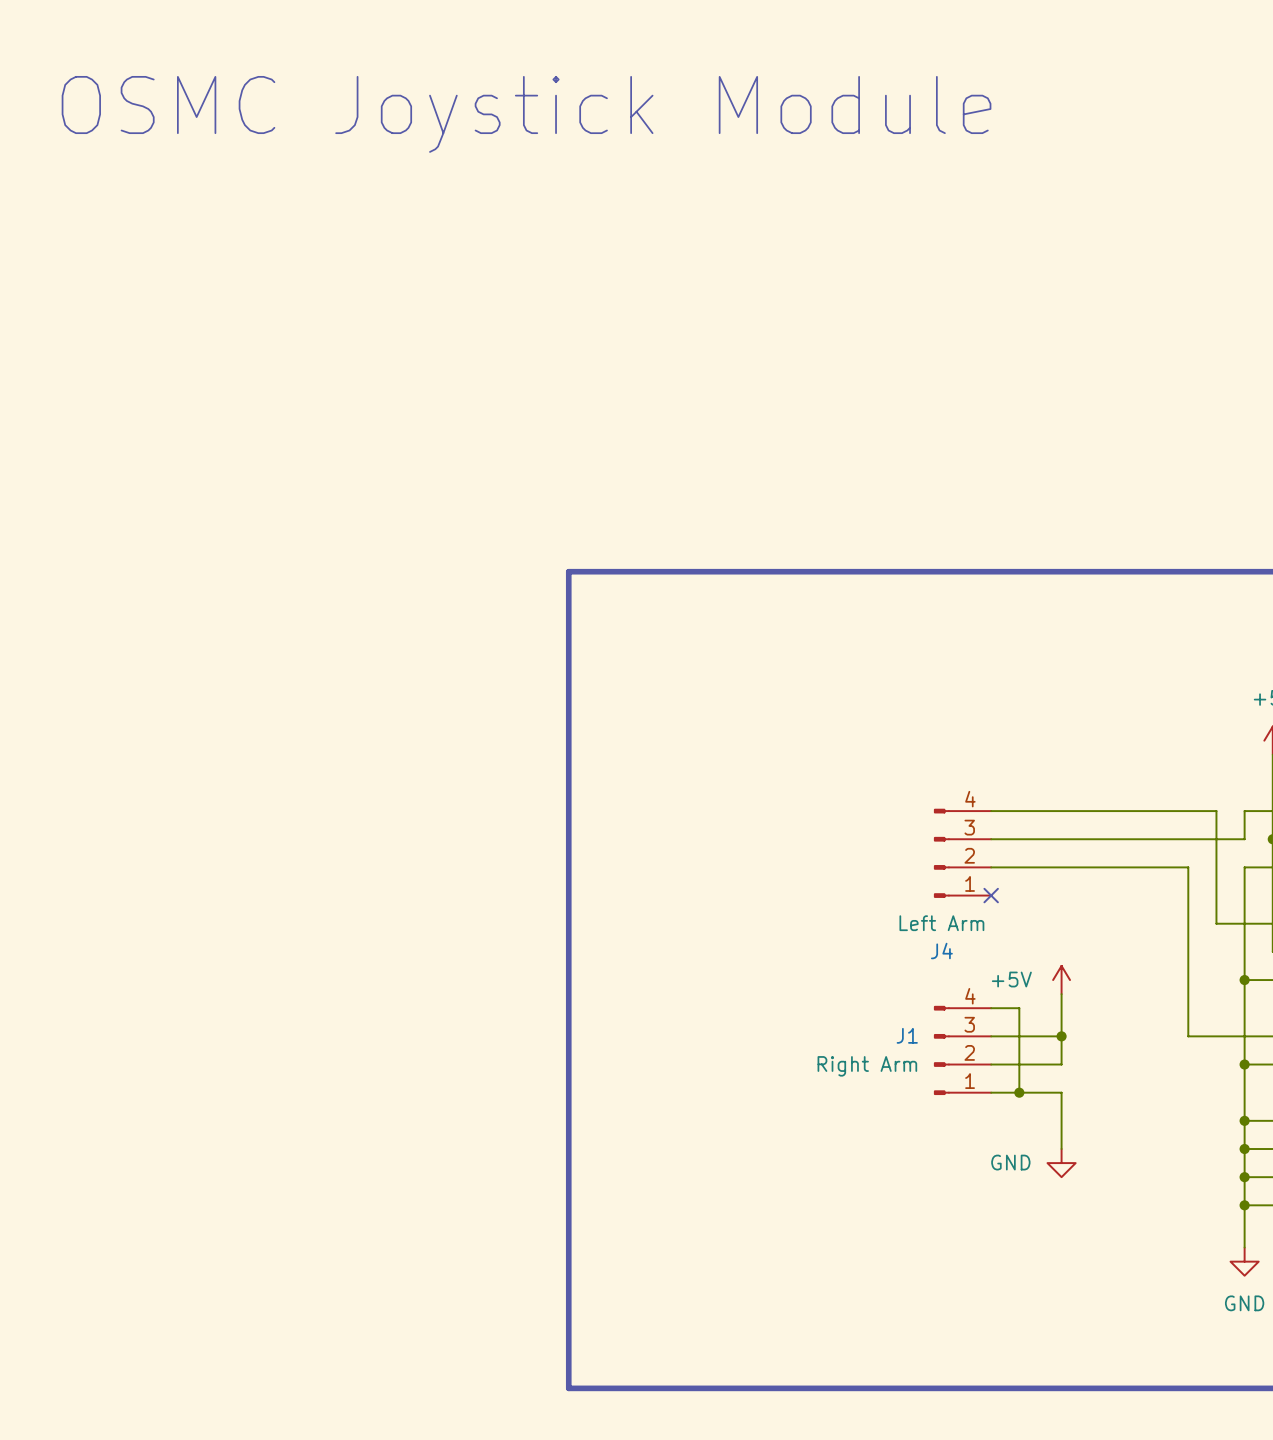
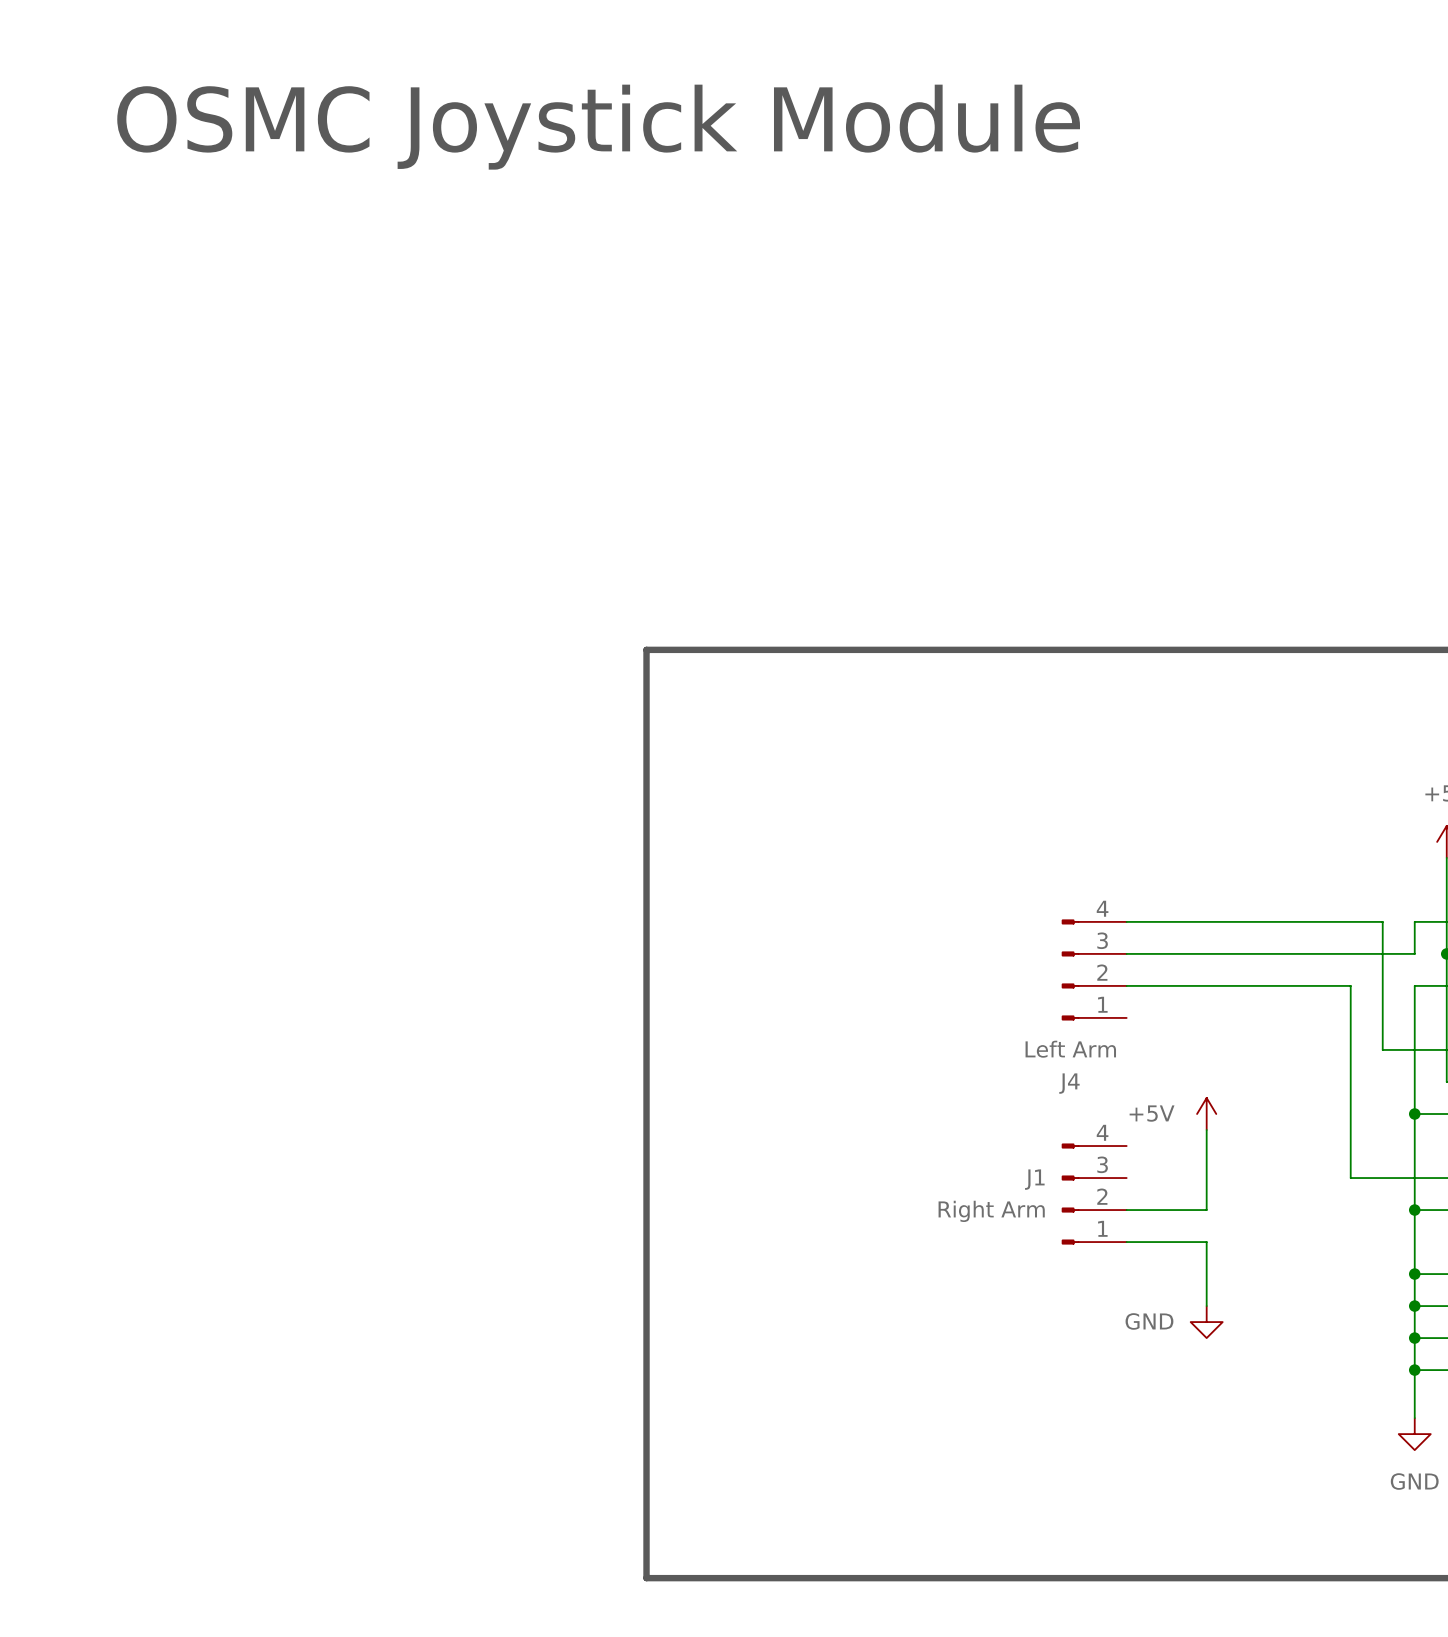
no-connect mark: (991, 895) -> none
wire: (991, 1008) (1019, 1008) (1019, 1092) -> none
wire: (991, 1036) (1061, 1036) -> none
junction: (1061, 1036) -> none
junction: (1019, 1092) -> none

